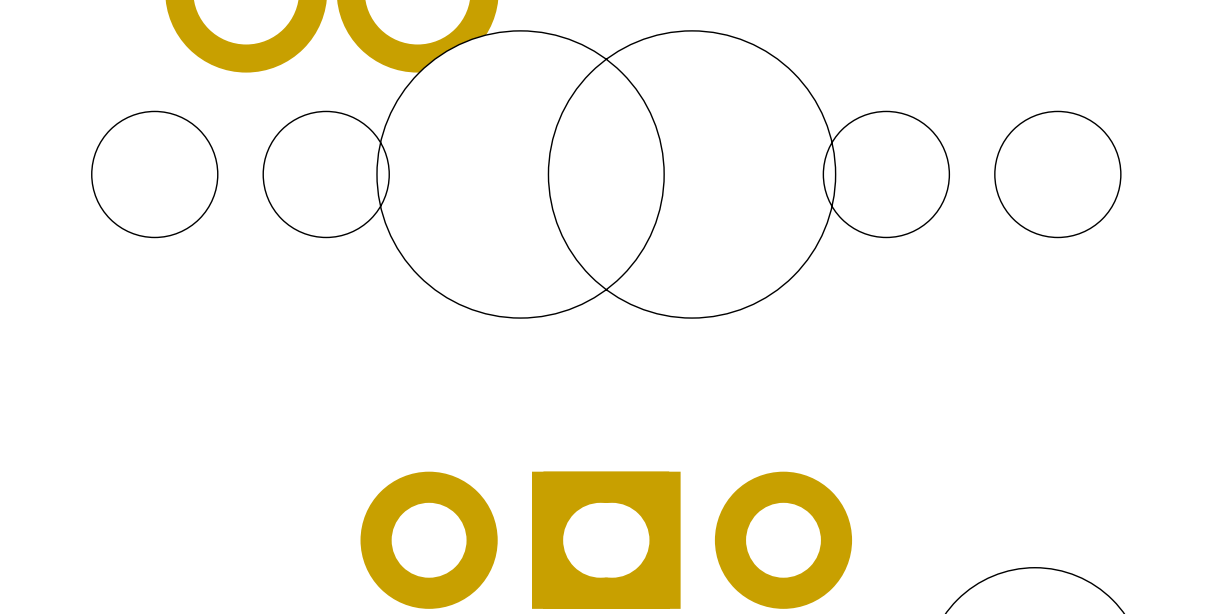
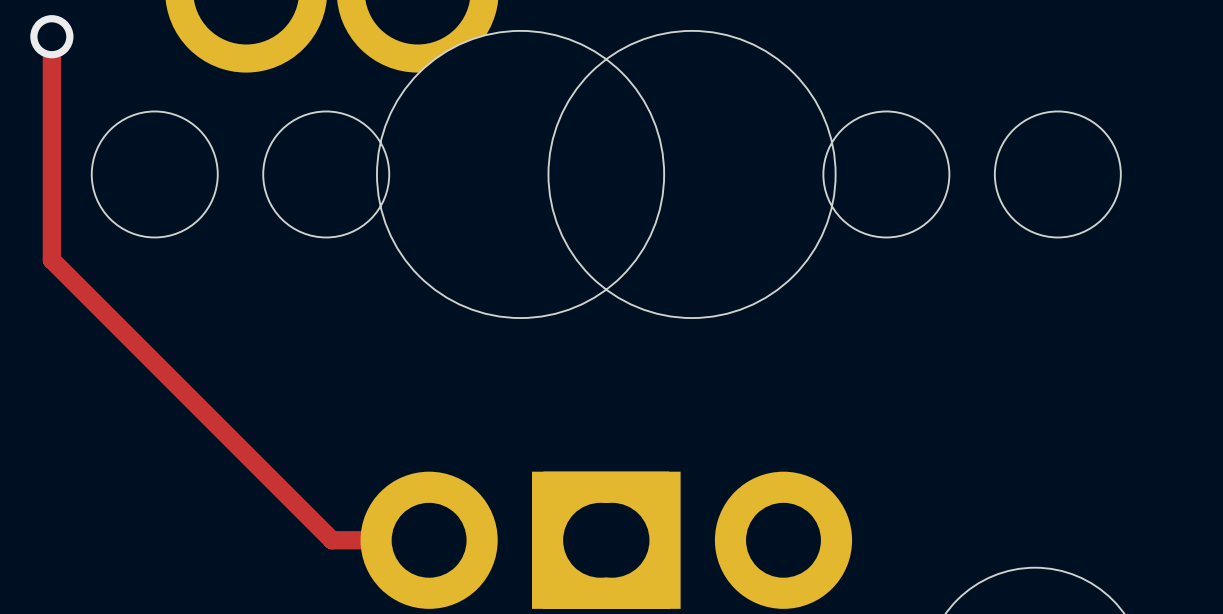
track: none -> (51, 36) (51, 260) (332, 540) (429, 540)
via: none -> (51, 36)

